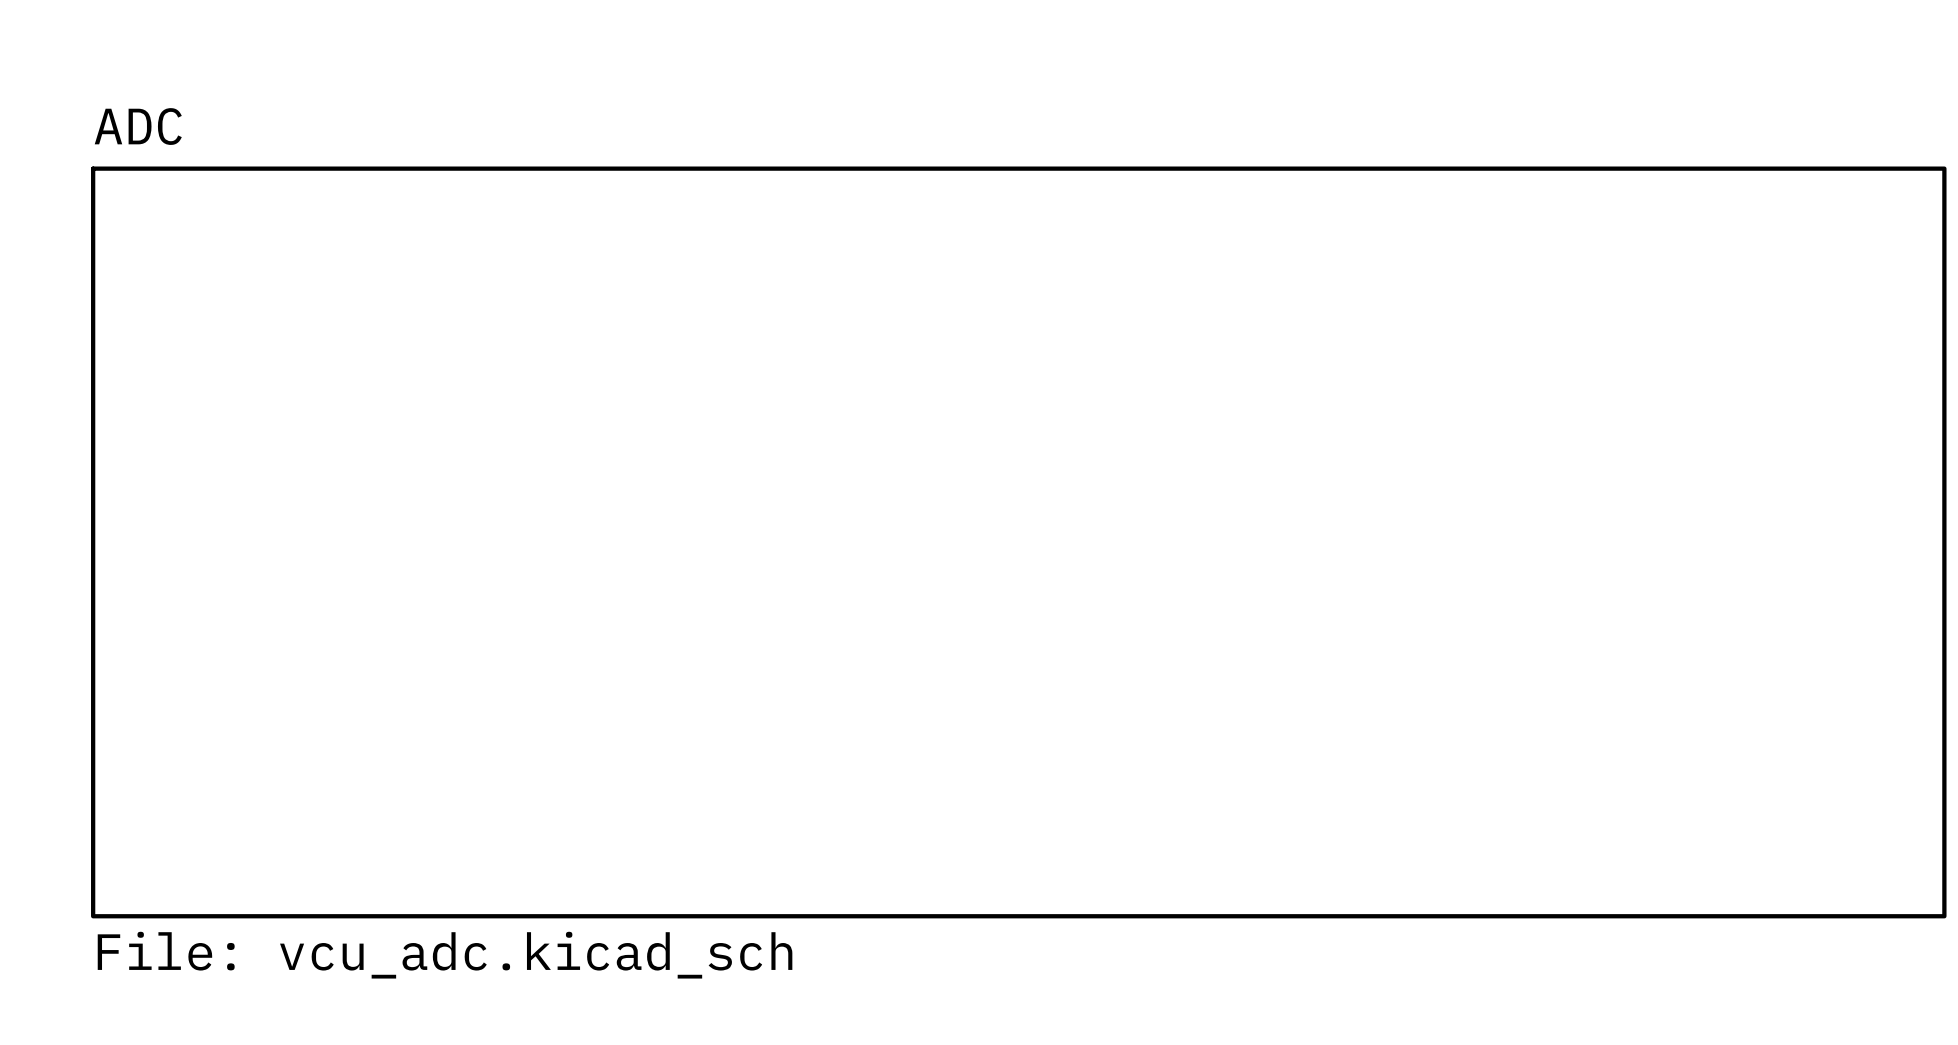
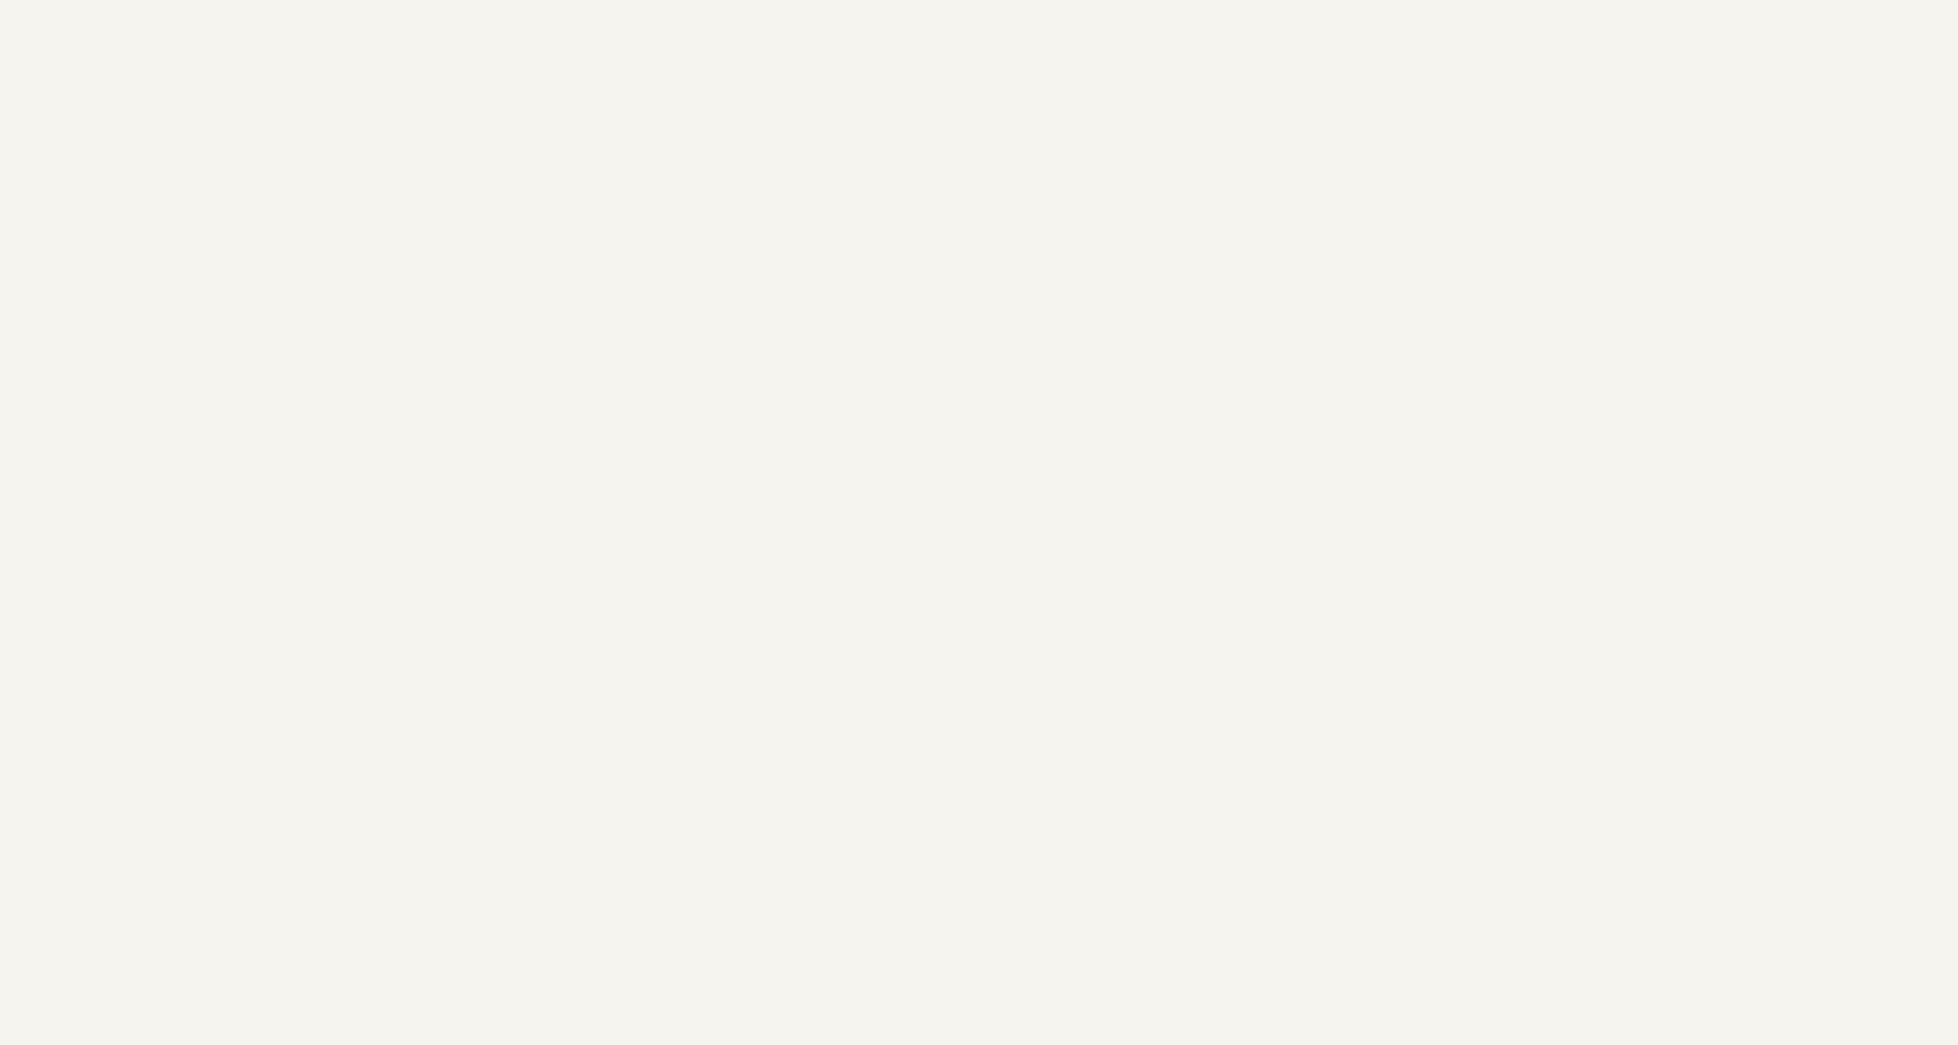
sheet ADC: File: vcu_adc.kicad_sch (1018, 542) -> none

